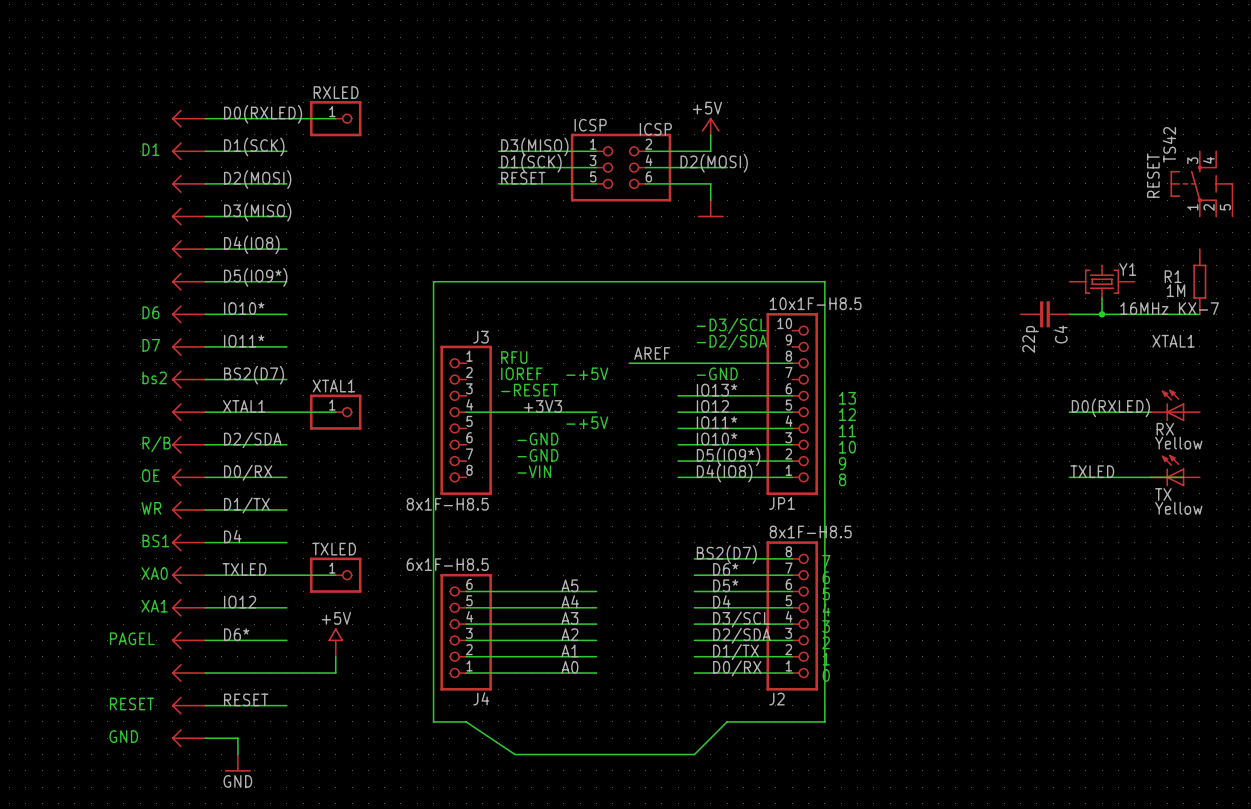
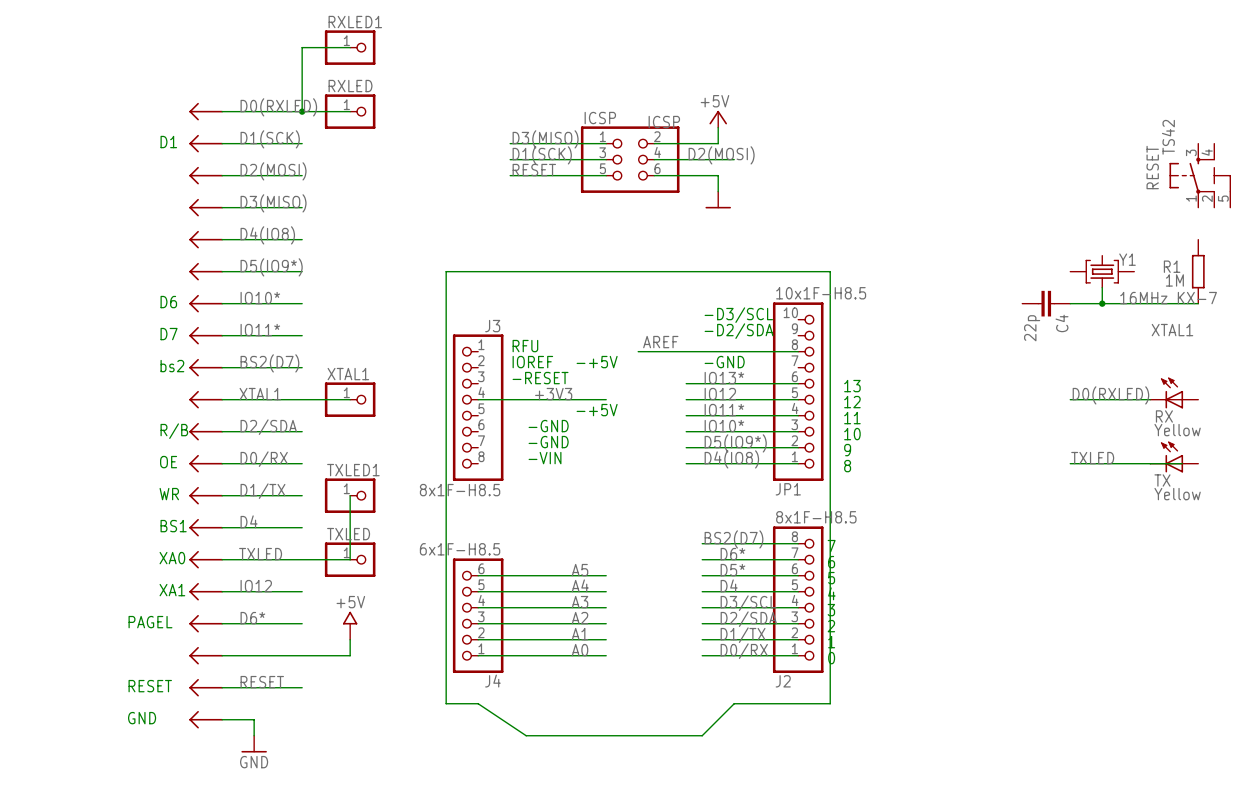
wire: none -> (350, 47) (302, 47) (302, 111)
RXLED1: none -> (350, 47)
junction: none -> (302, 111)
wire: none -> (350, 495) (350, 559)
TXLED1: none -> (350, 495)

